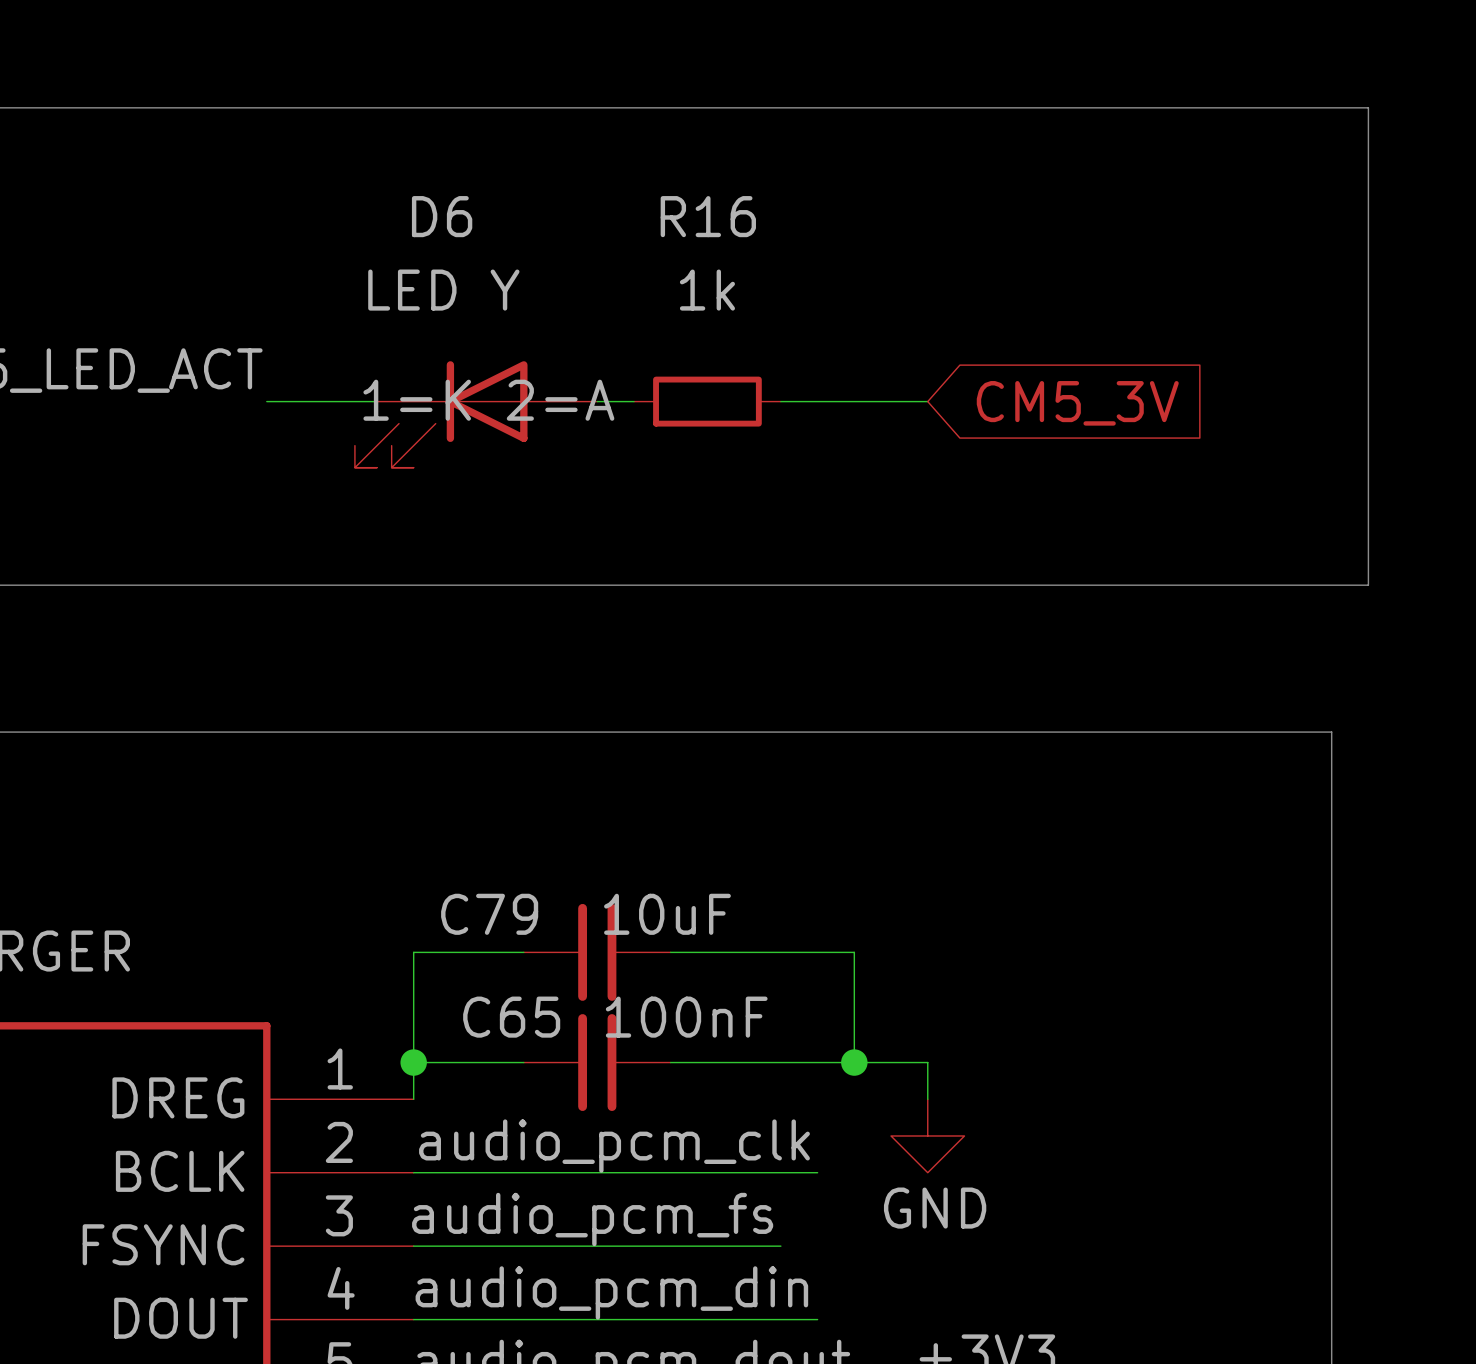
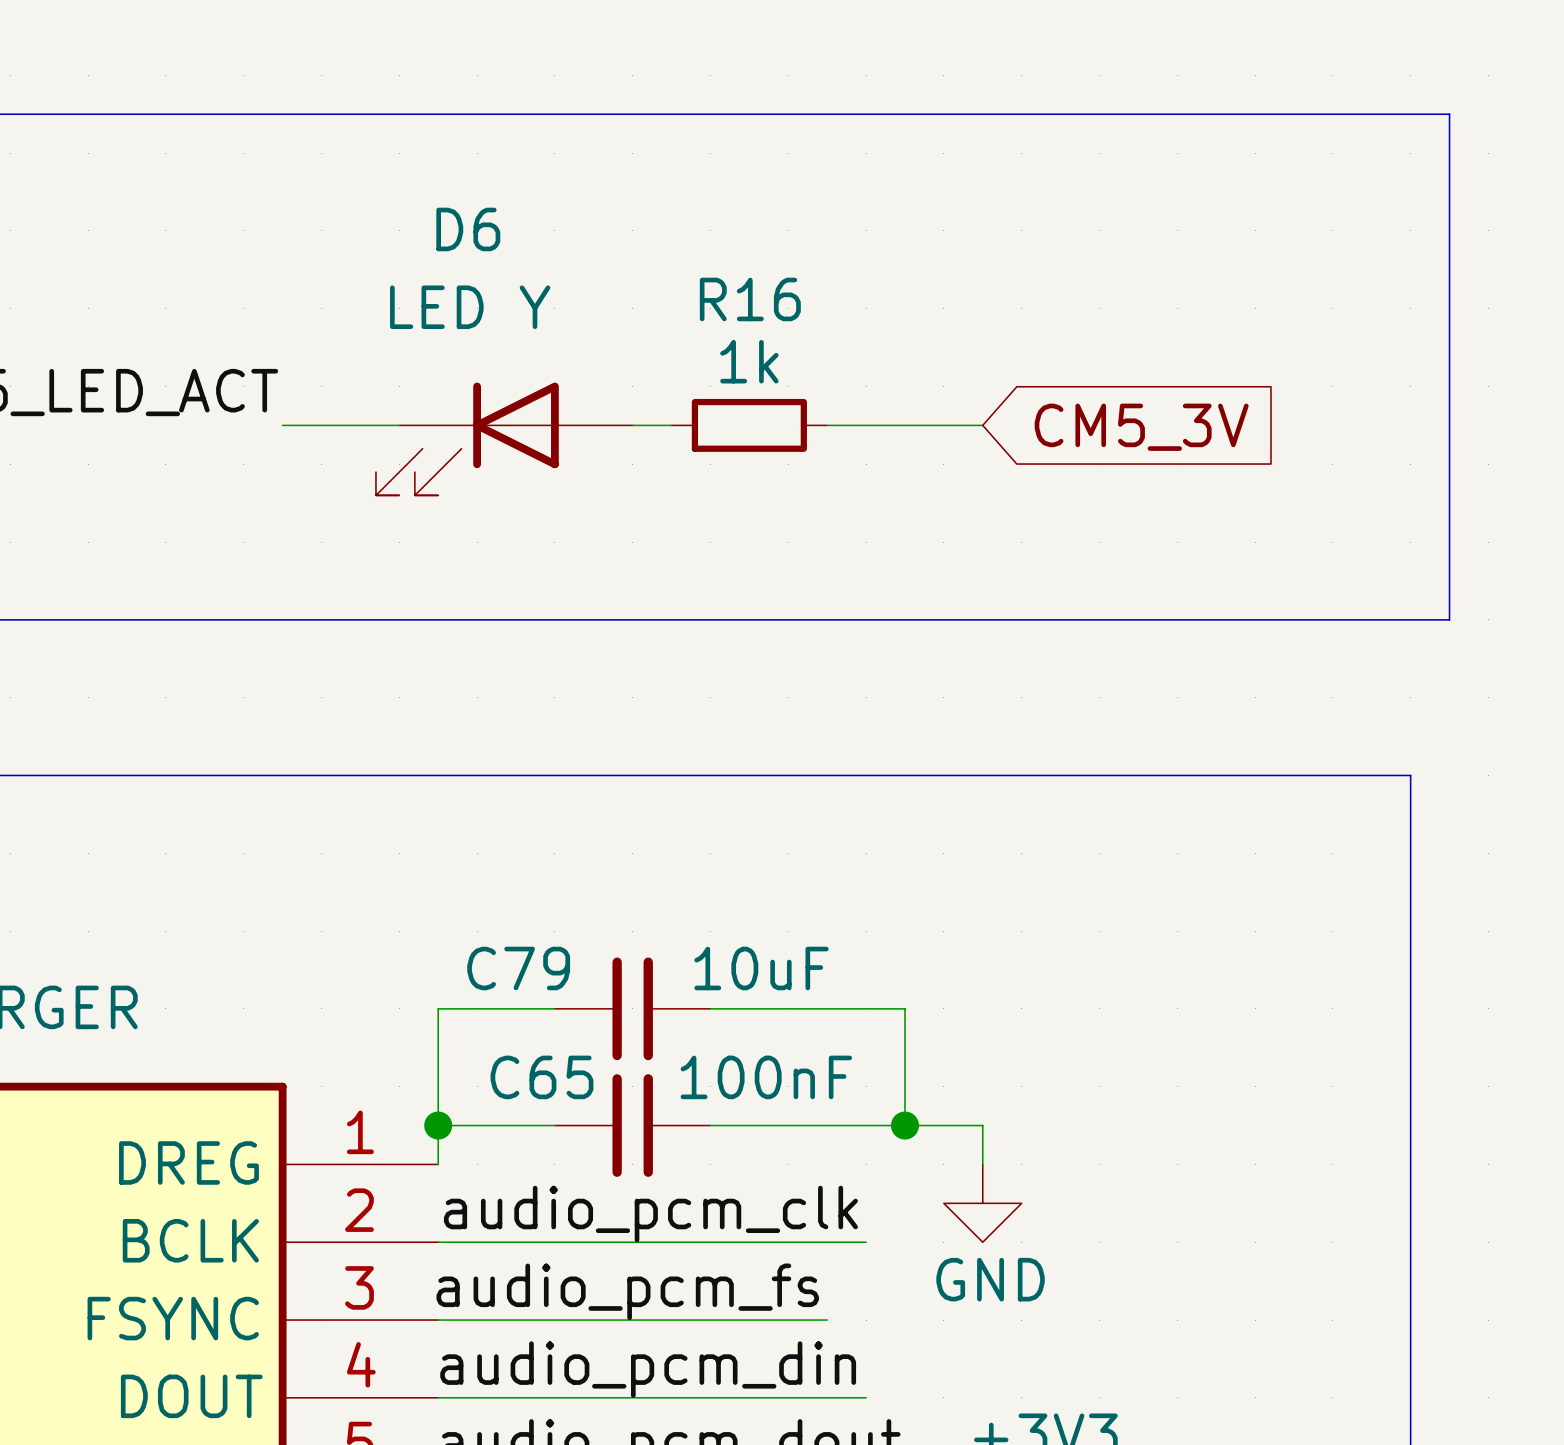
R16 name position: R16 (708, 216) -> R16 (750, 299)
R16 value position: 1k (707, 290) -> 1k (749, 361)
D6 text: 1=K 2=A (488, 400) -> none
C79 value position: 10uF (667, 914) -> 10uF (761, 968)
C65 value position: 100nF (686, 1017) -> 100nF (766, 1077)

